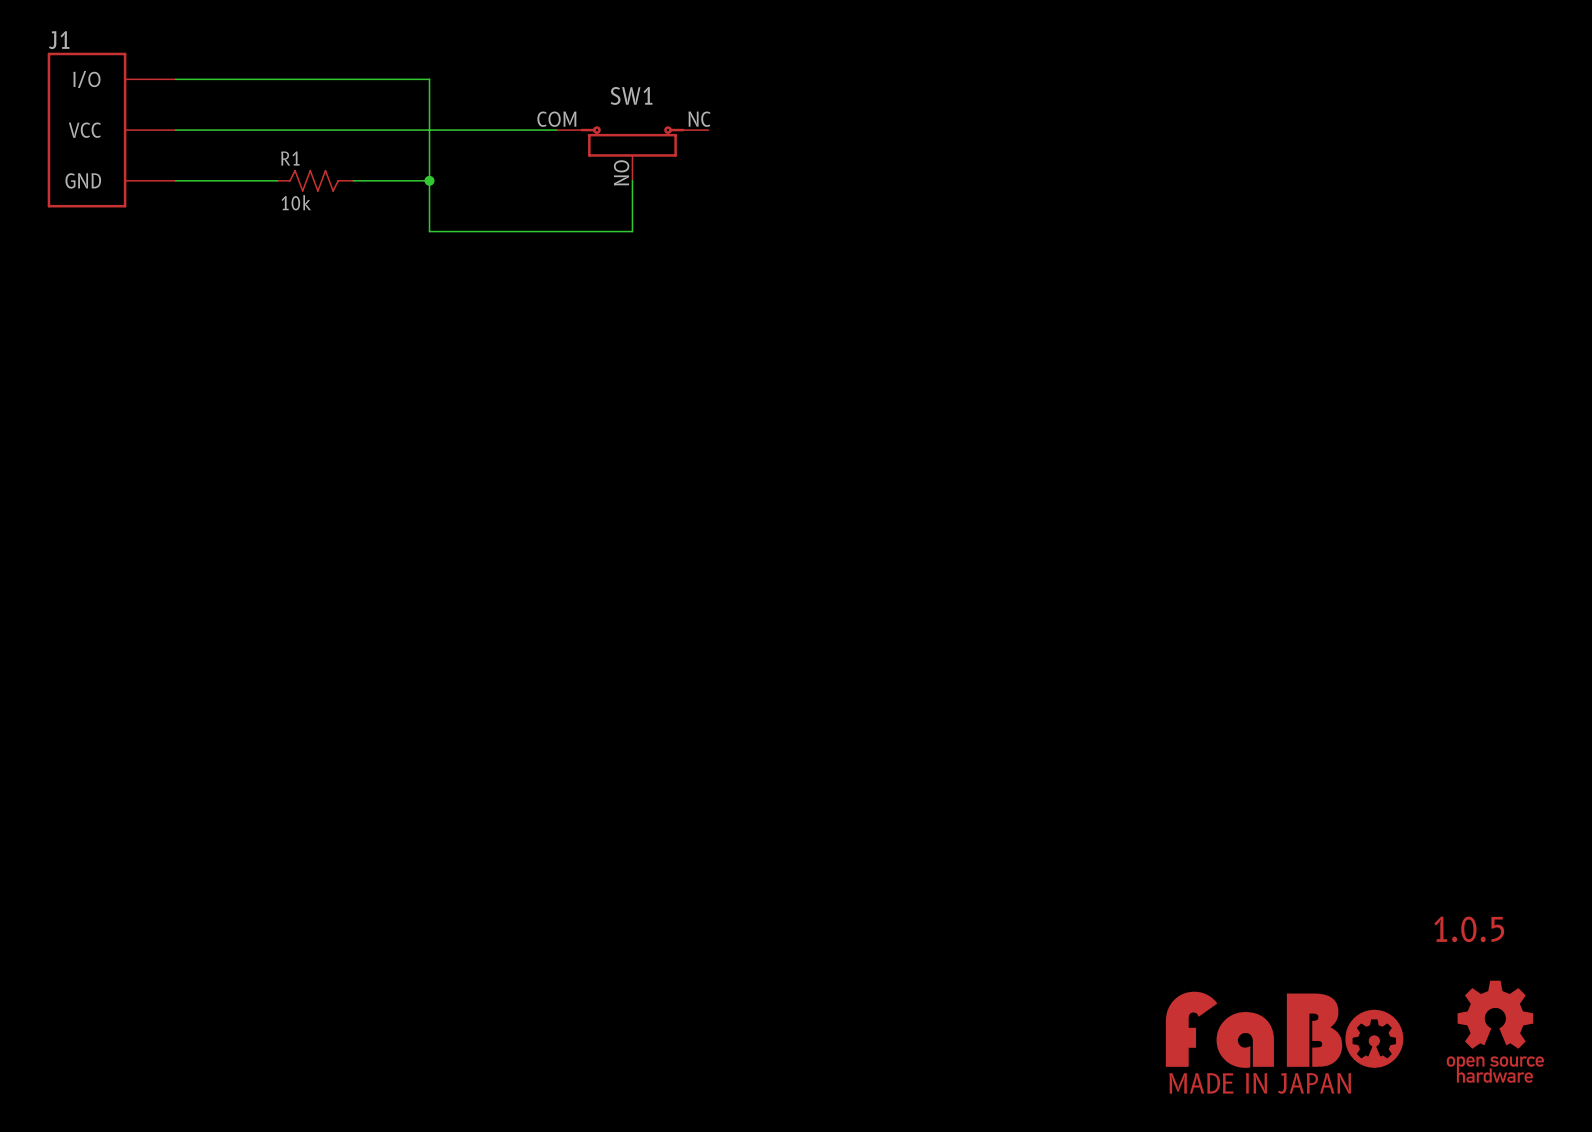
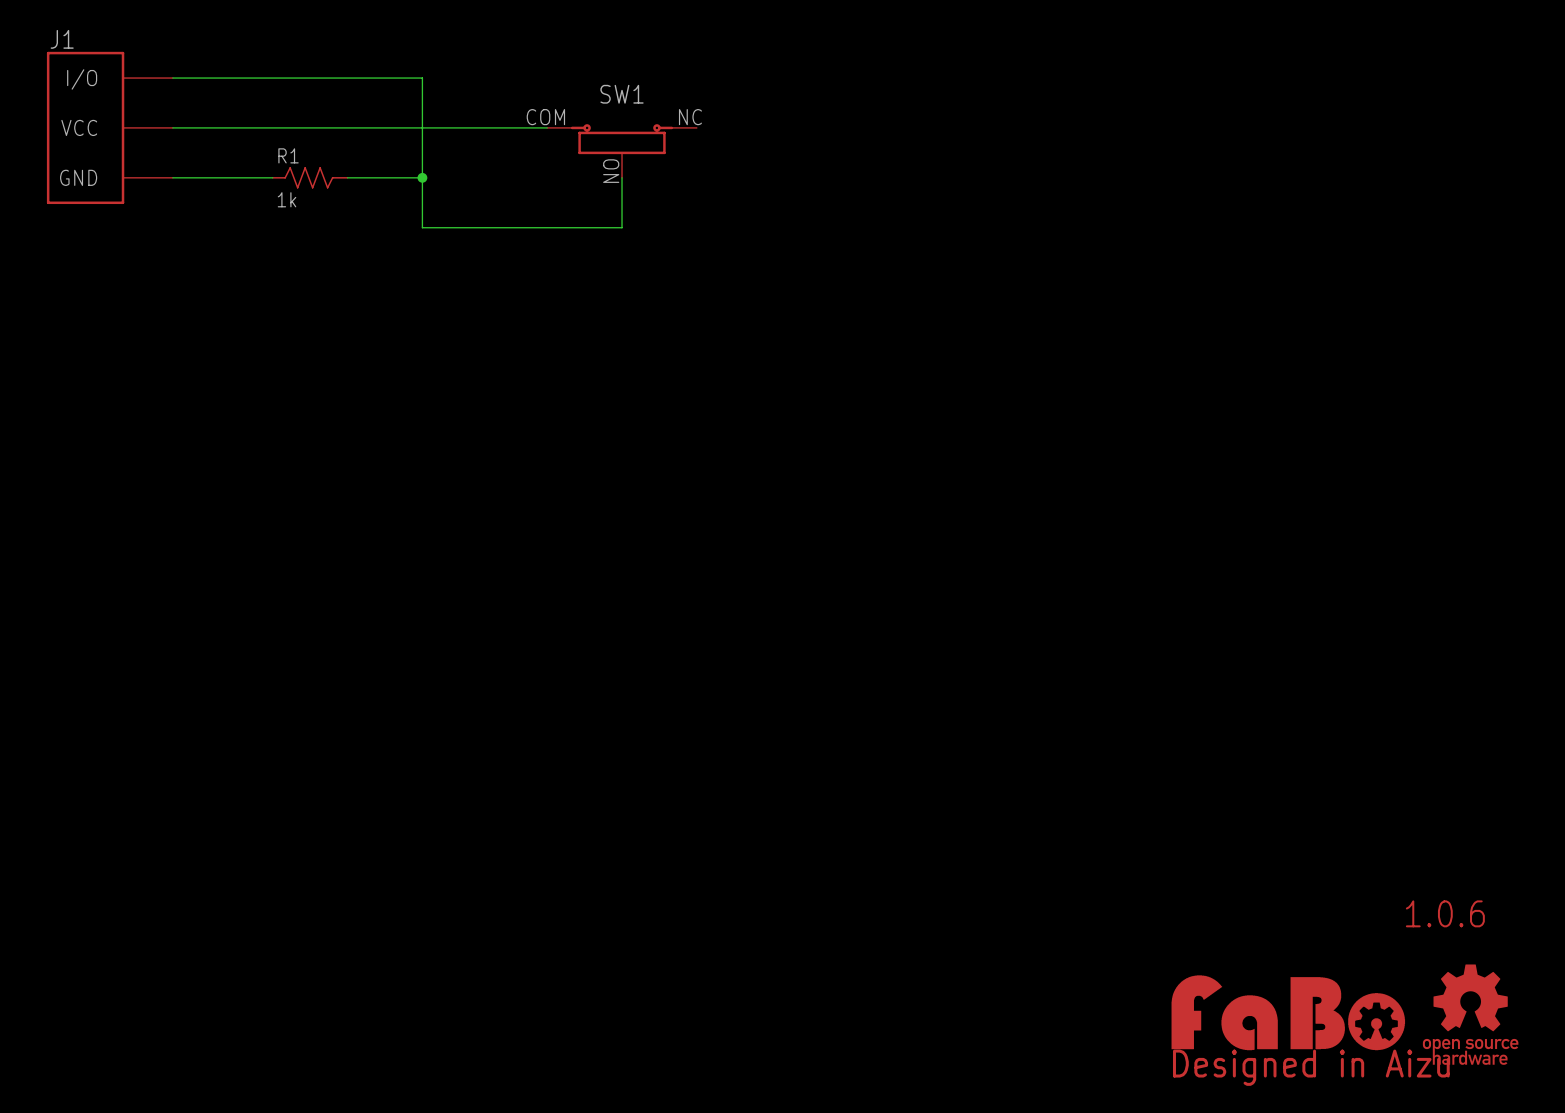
R1 value: 10k (296, 202) -> 1k (287, 199)
text: 1.0.5 (1469, 929) -> 1.0.6 (1445, 913)
part: (1284, 1029) -> none
part: none -> (1288, 1012)

